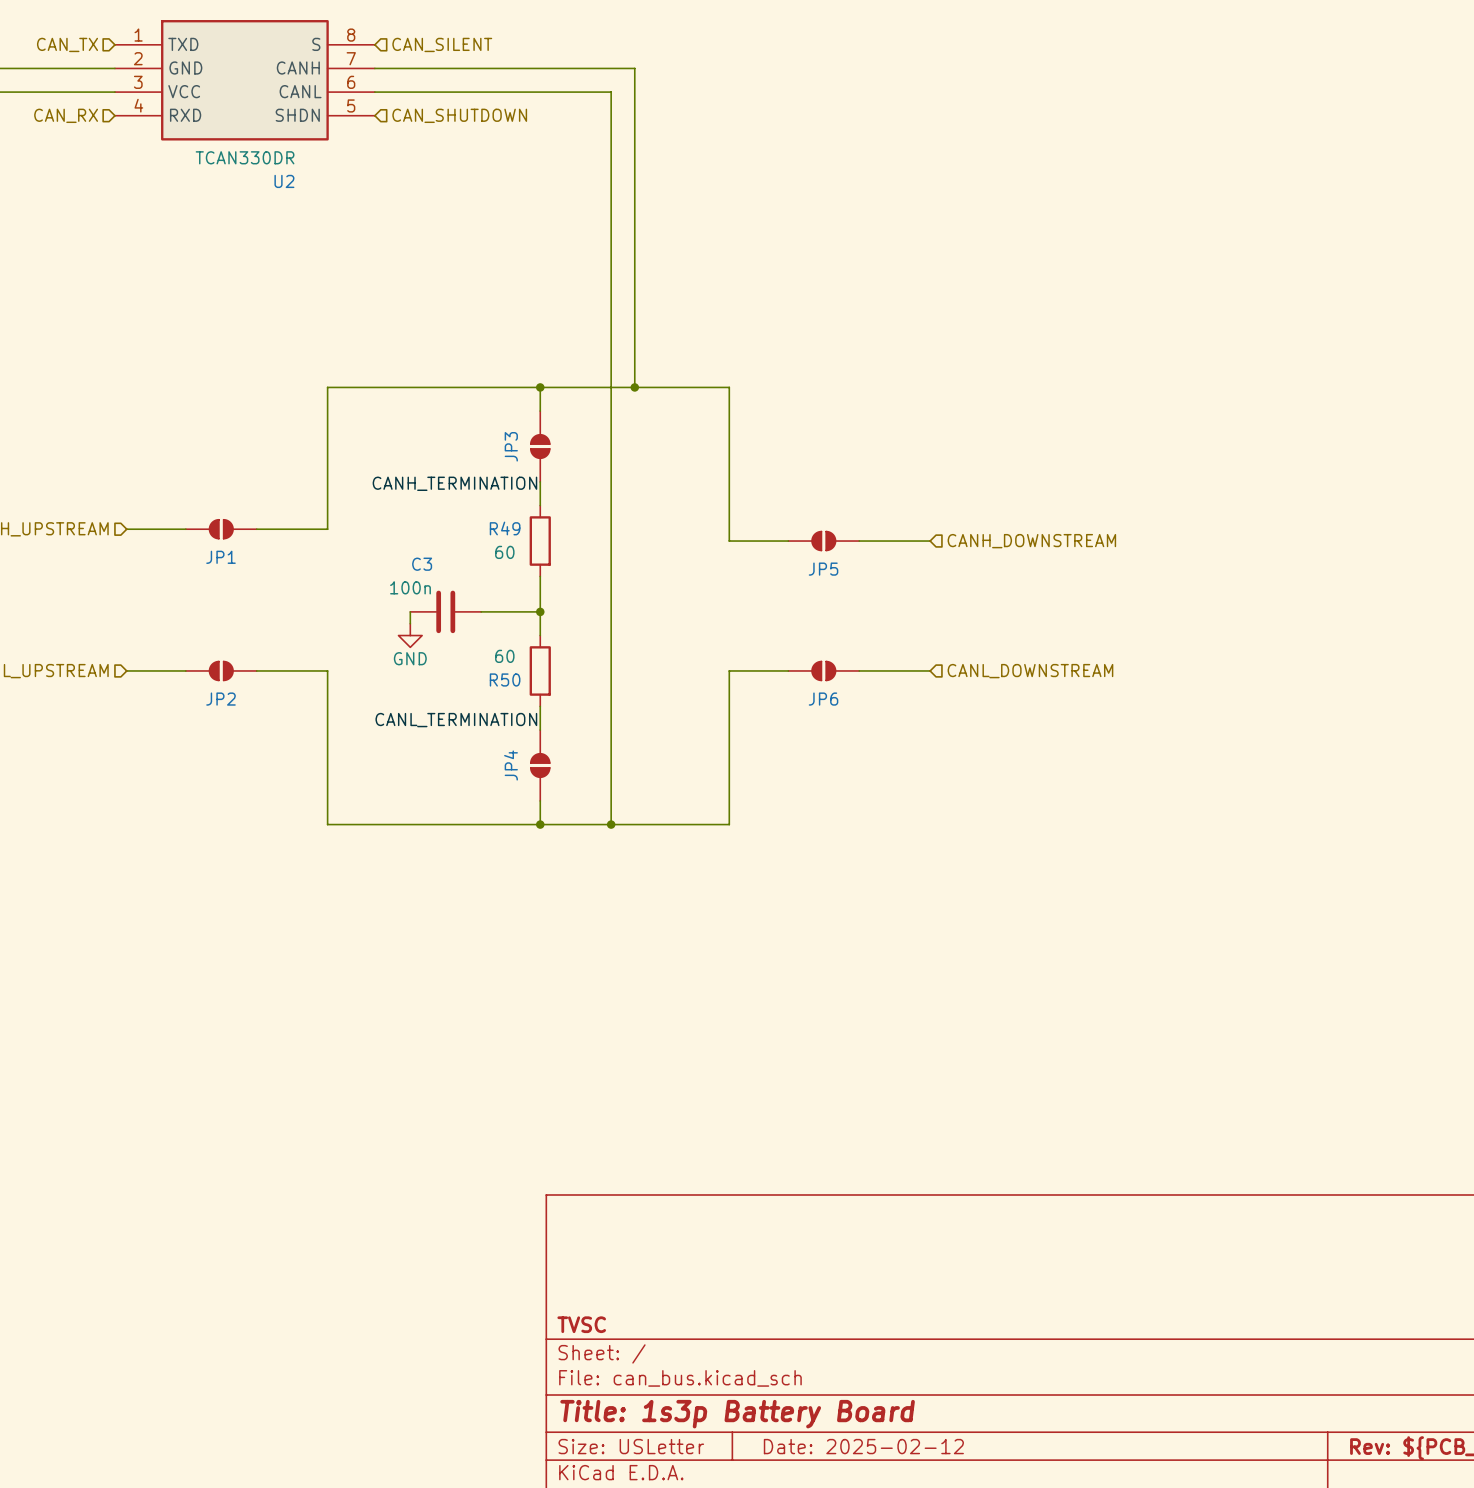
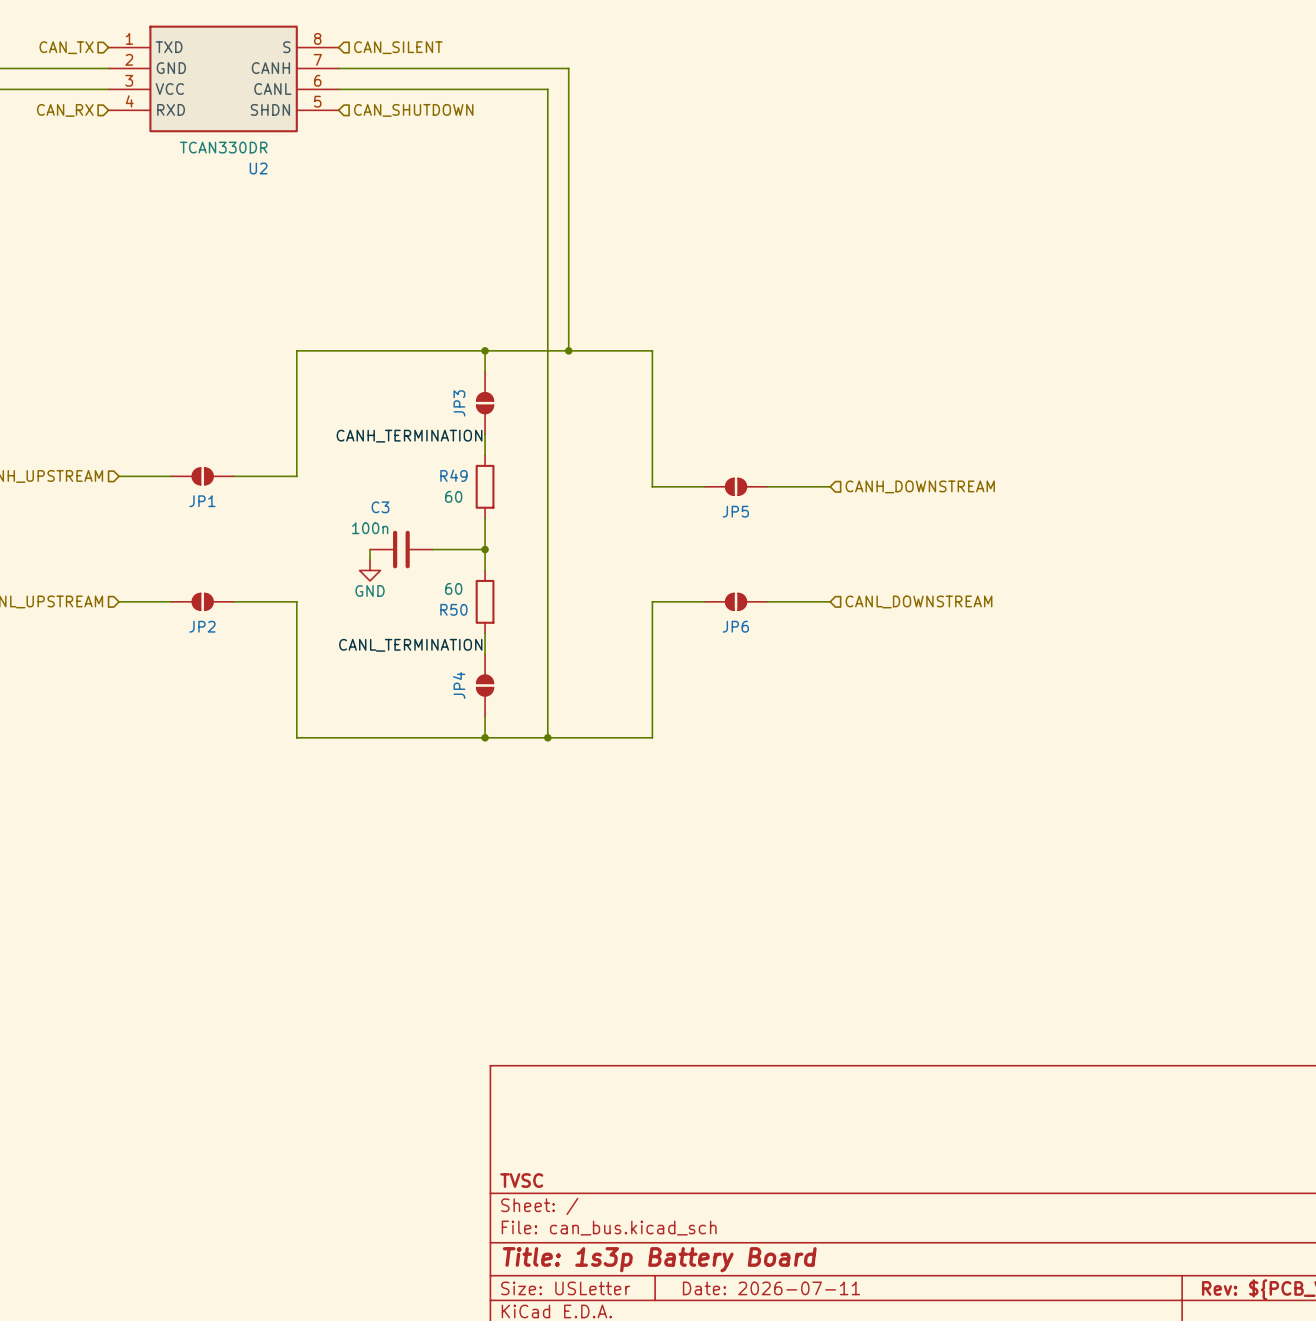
title block: Date: 2025-02-12 (863, 1446) -> Date: 2026-07-11 (771, 1288)

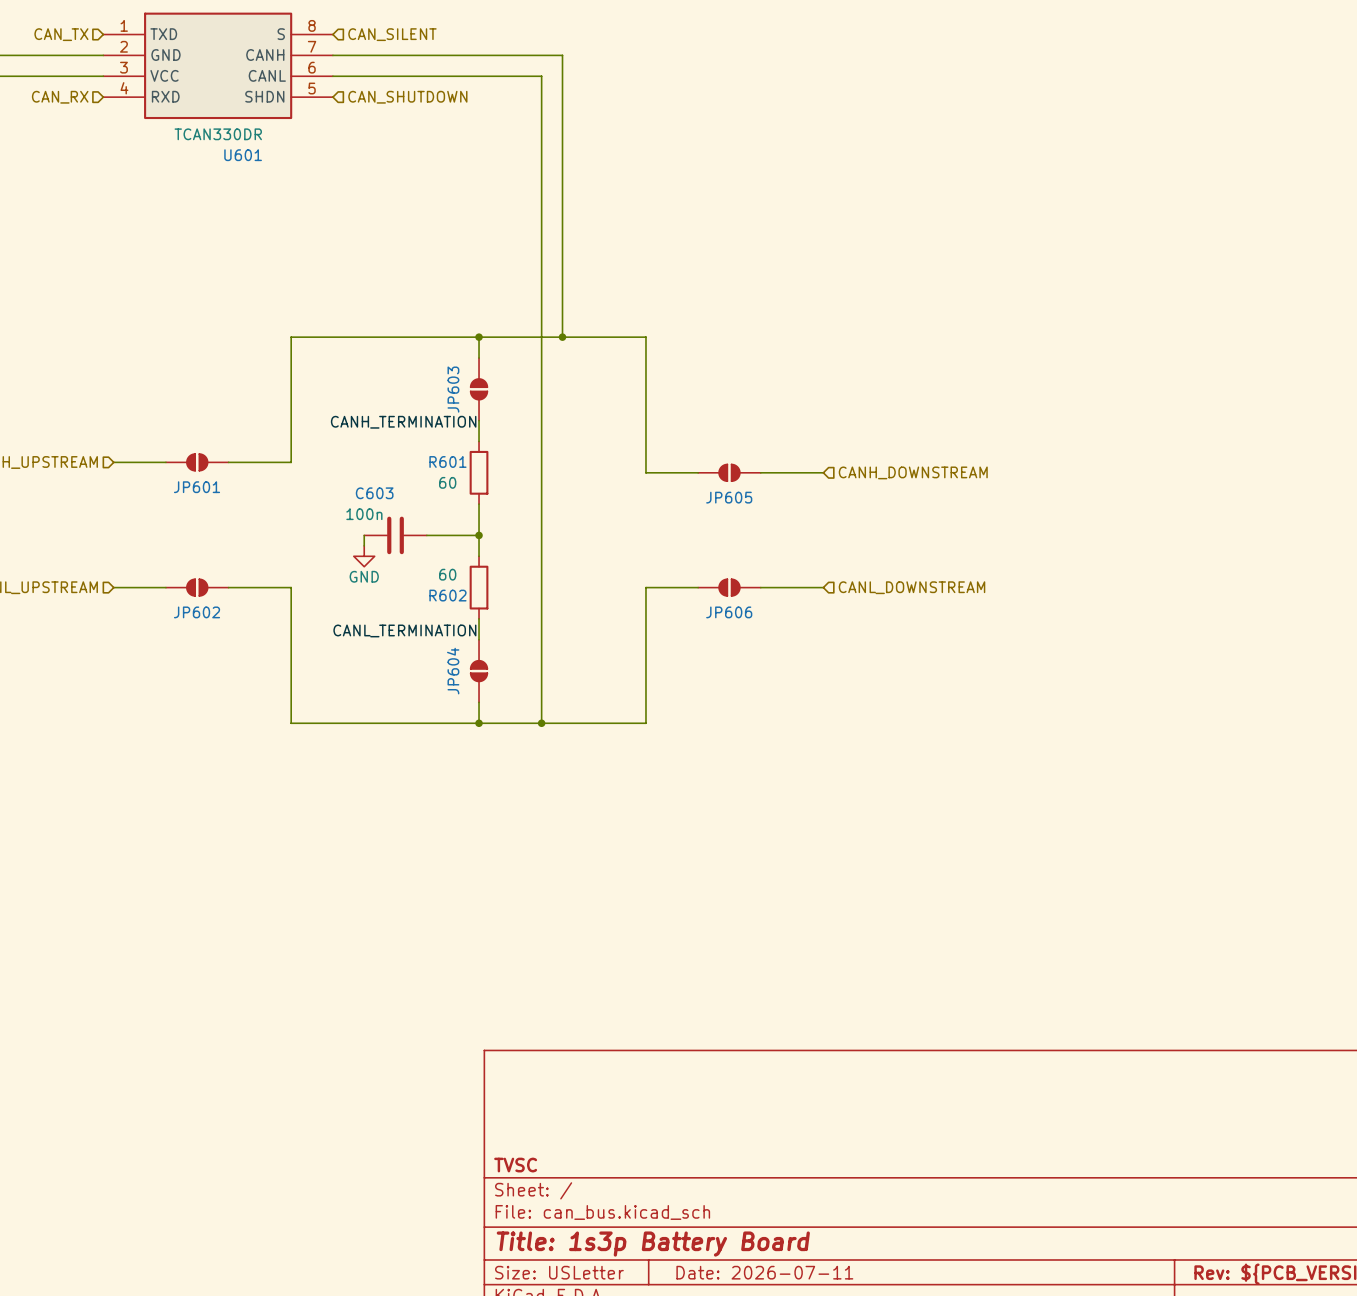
U2 name: U2 (258, 168) -> U601 (243, 155)
JP3 name: JP3 (459, 403) -> JP603 (453, 389)
R49 name: R49 (453, 475) -> R601 (447, 461)
JP1 name: JP1 (202, 501) -> JP601 (197, 487)
C3 name: C3 (380, 507) -> C603 (374, 493)
JP5 name: JP5 (735, 511) -> JP605 (729, 497)
R50 name: R50 (453, 609) -> R602 (447, 595)
JP2 name: JP2 (202, 626) -> JP602 (197, 612)
JP6 name: JP6 (735, 626) -> JP606 (729, 612)
JP4 name: JP4 (459, 685) -> JP604 (453, 671)

